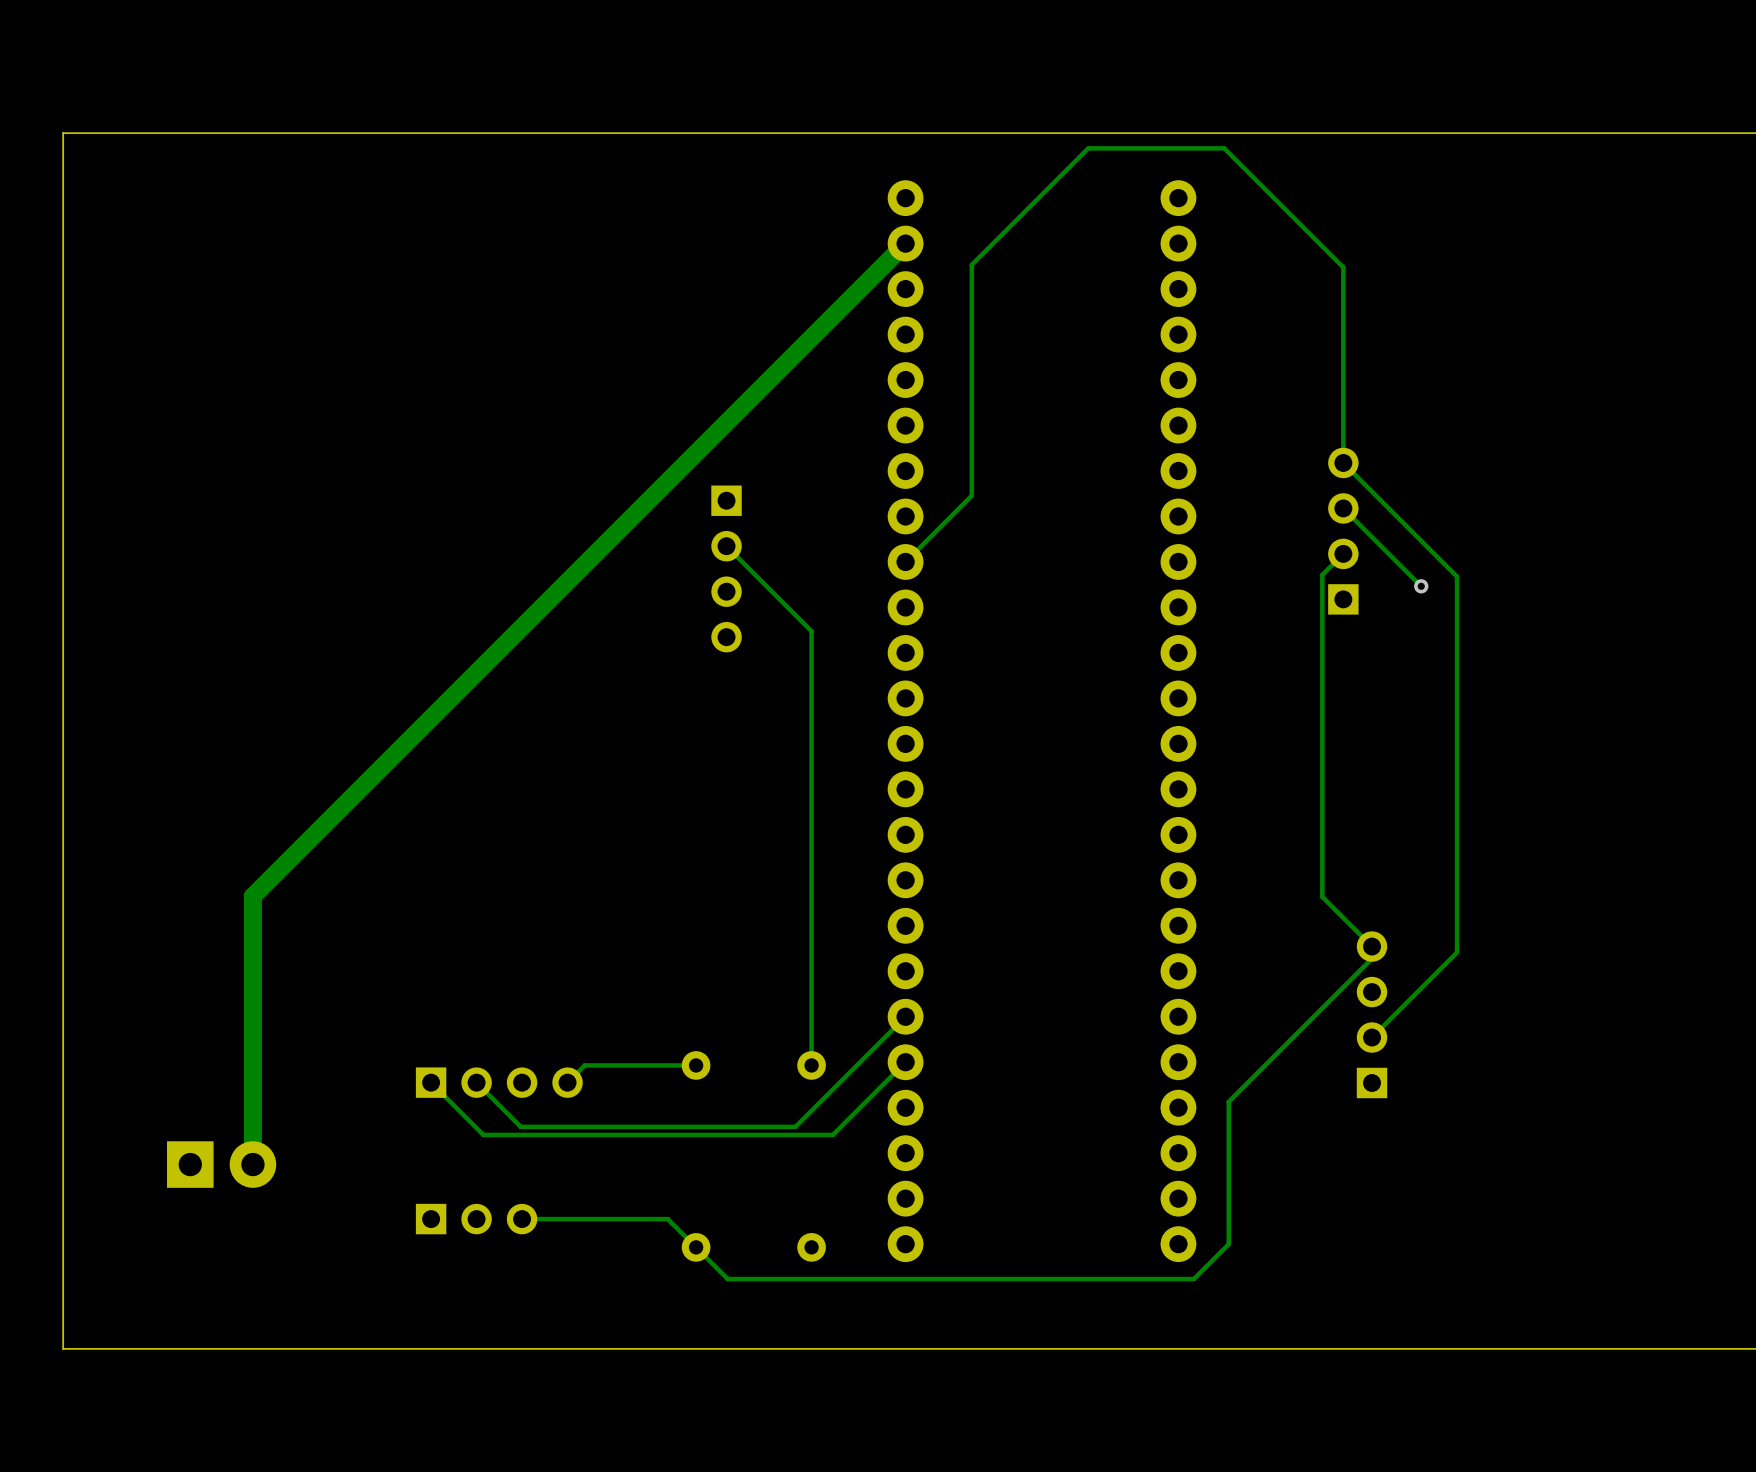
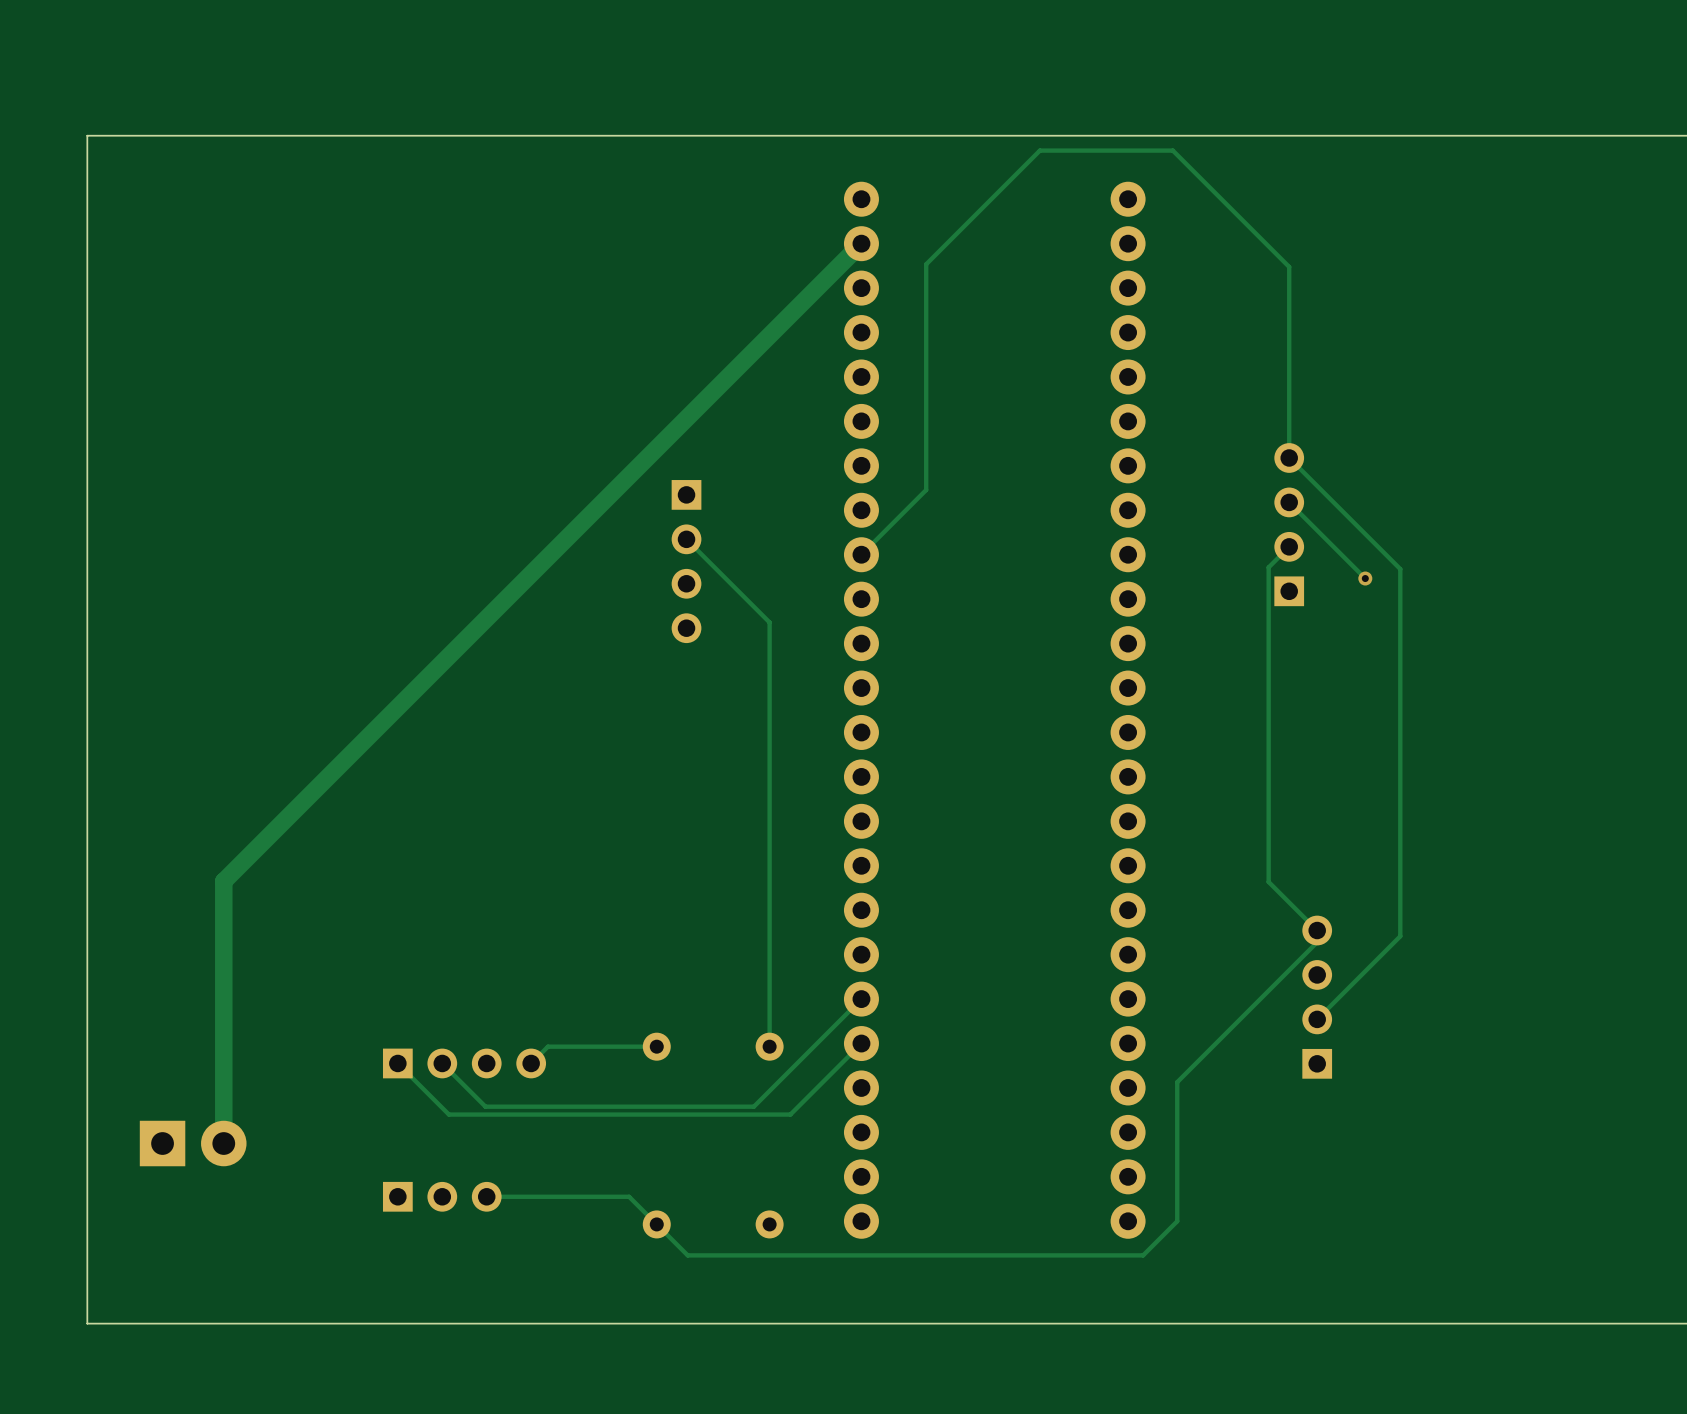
board edge: (113, 133) (63, 133) (63, 1348) (113, 1348) -> (87, 135) (87, 1323)

